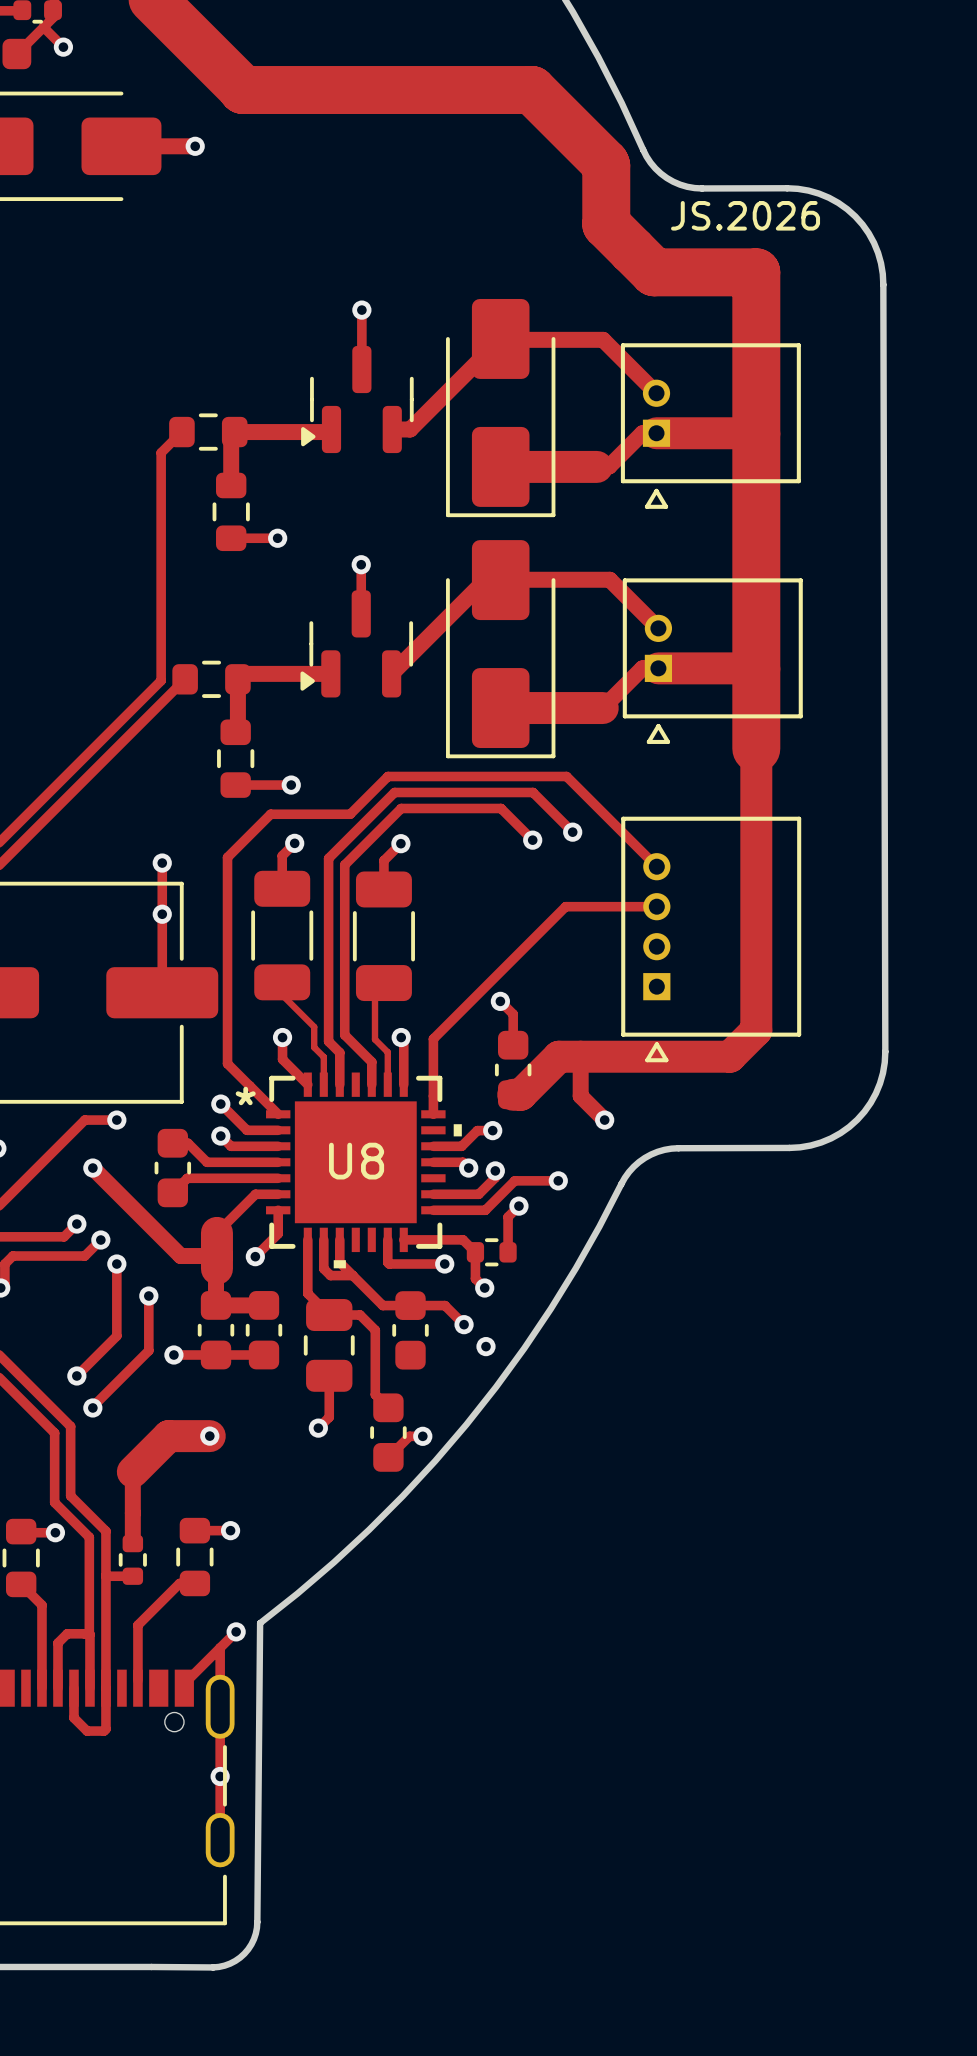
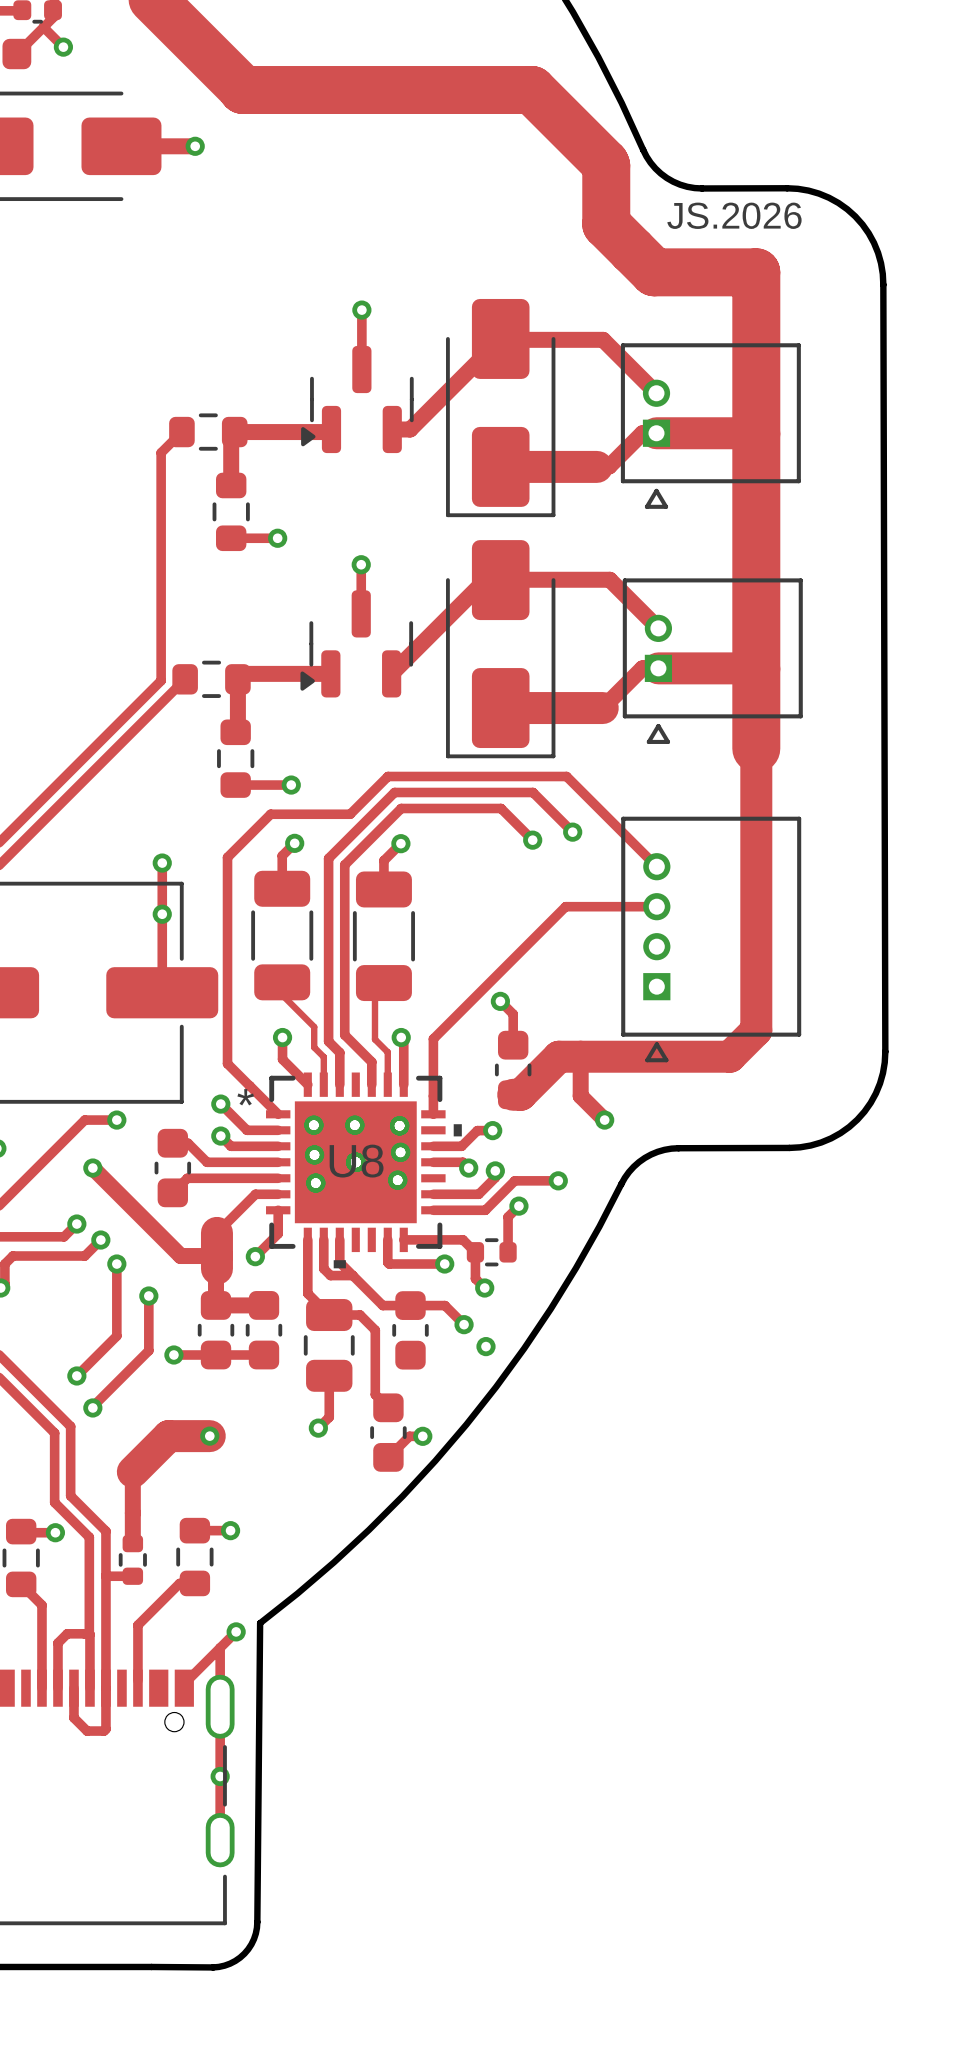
via: none -> (313, 1125)
via: none -> (354, 1125)
via: none -> (399, 1125)
via: none -> (400, 1152)
via: none -> (314, 1154)
via: none -> (355, 1162)
via: none -> (397, 1180)
via: none -> (315, 1183)

